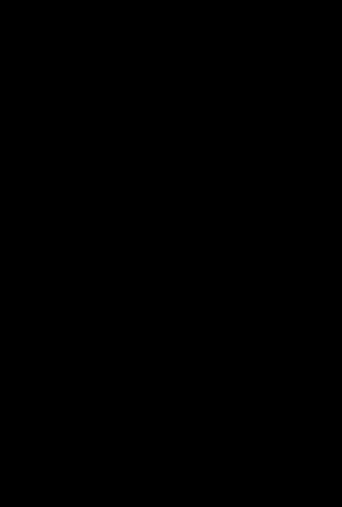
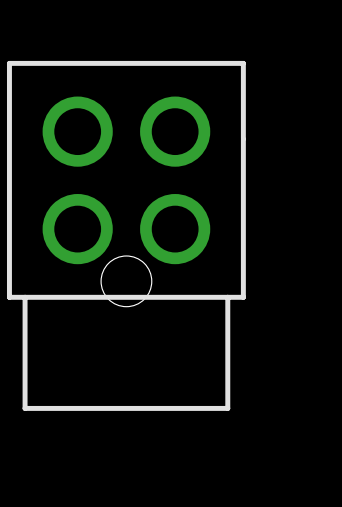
part: none -> (126, 235)

